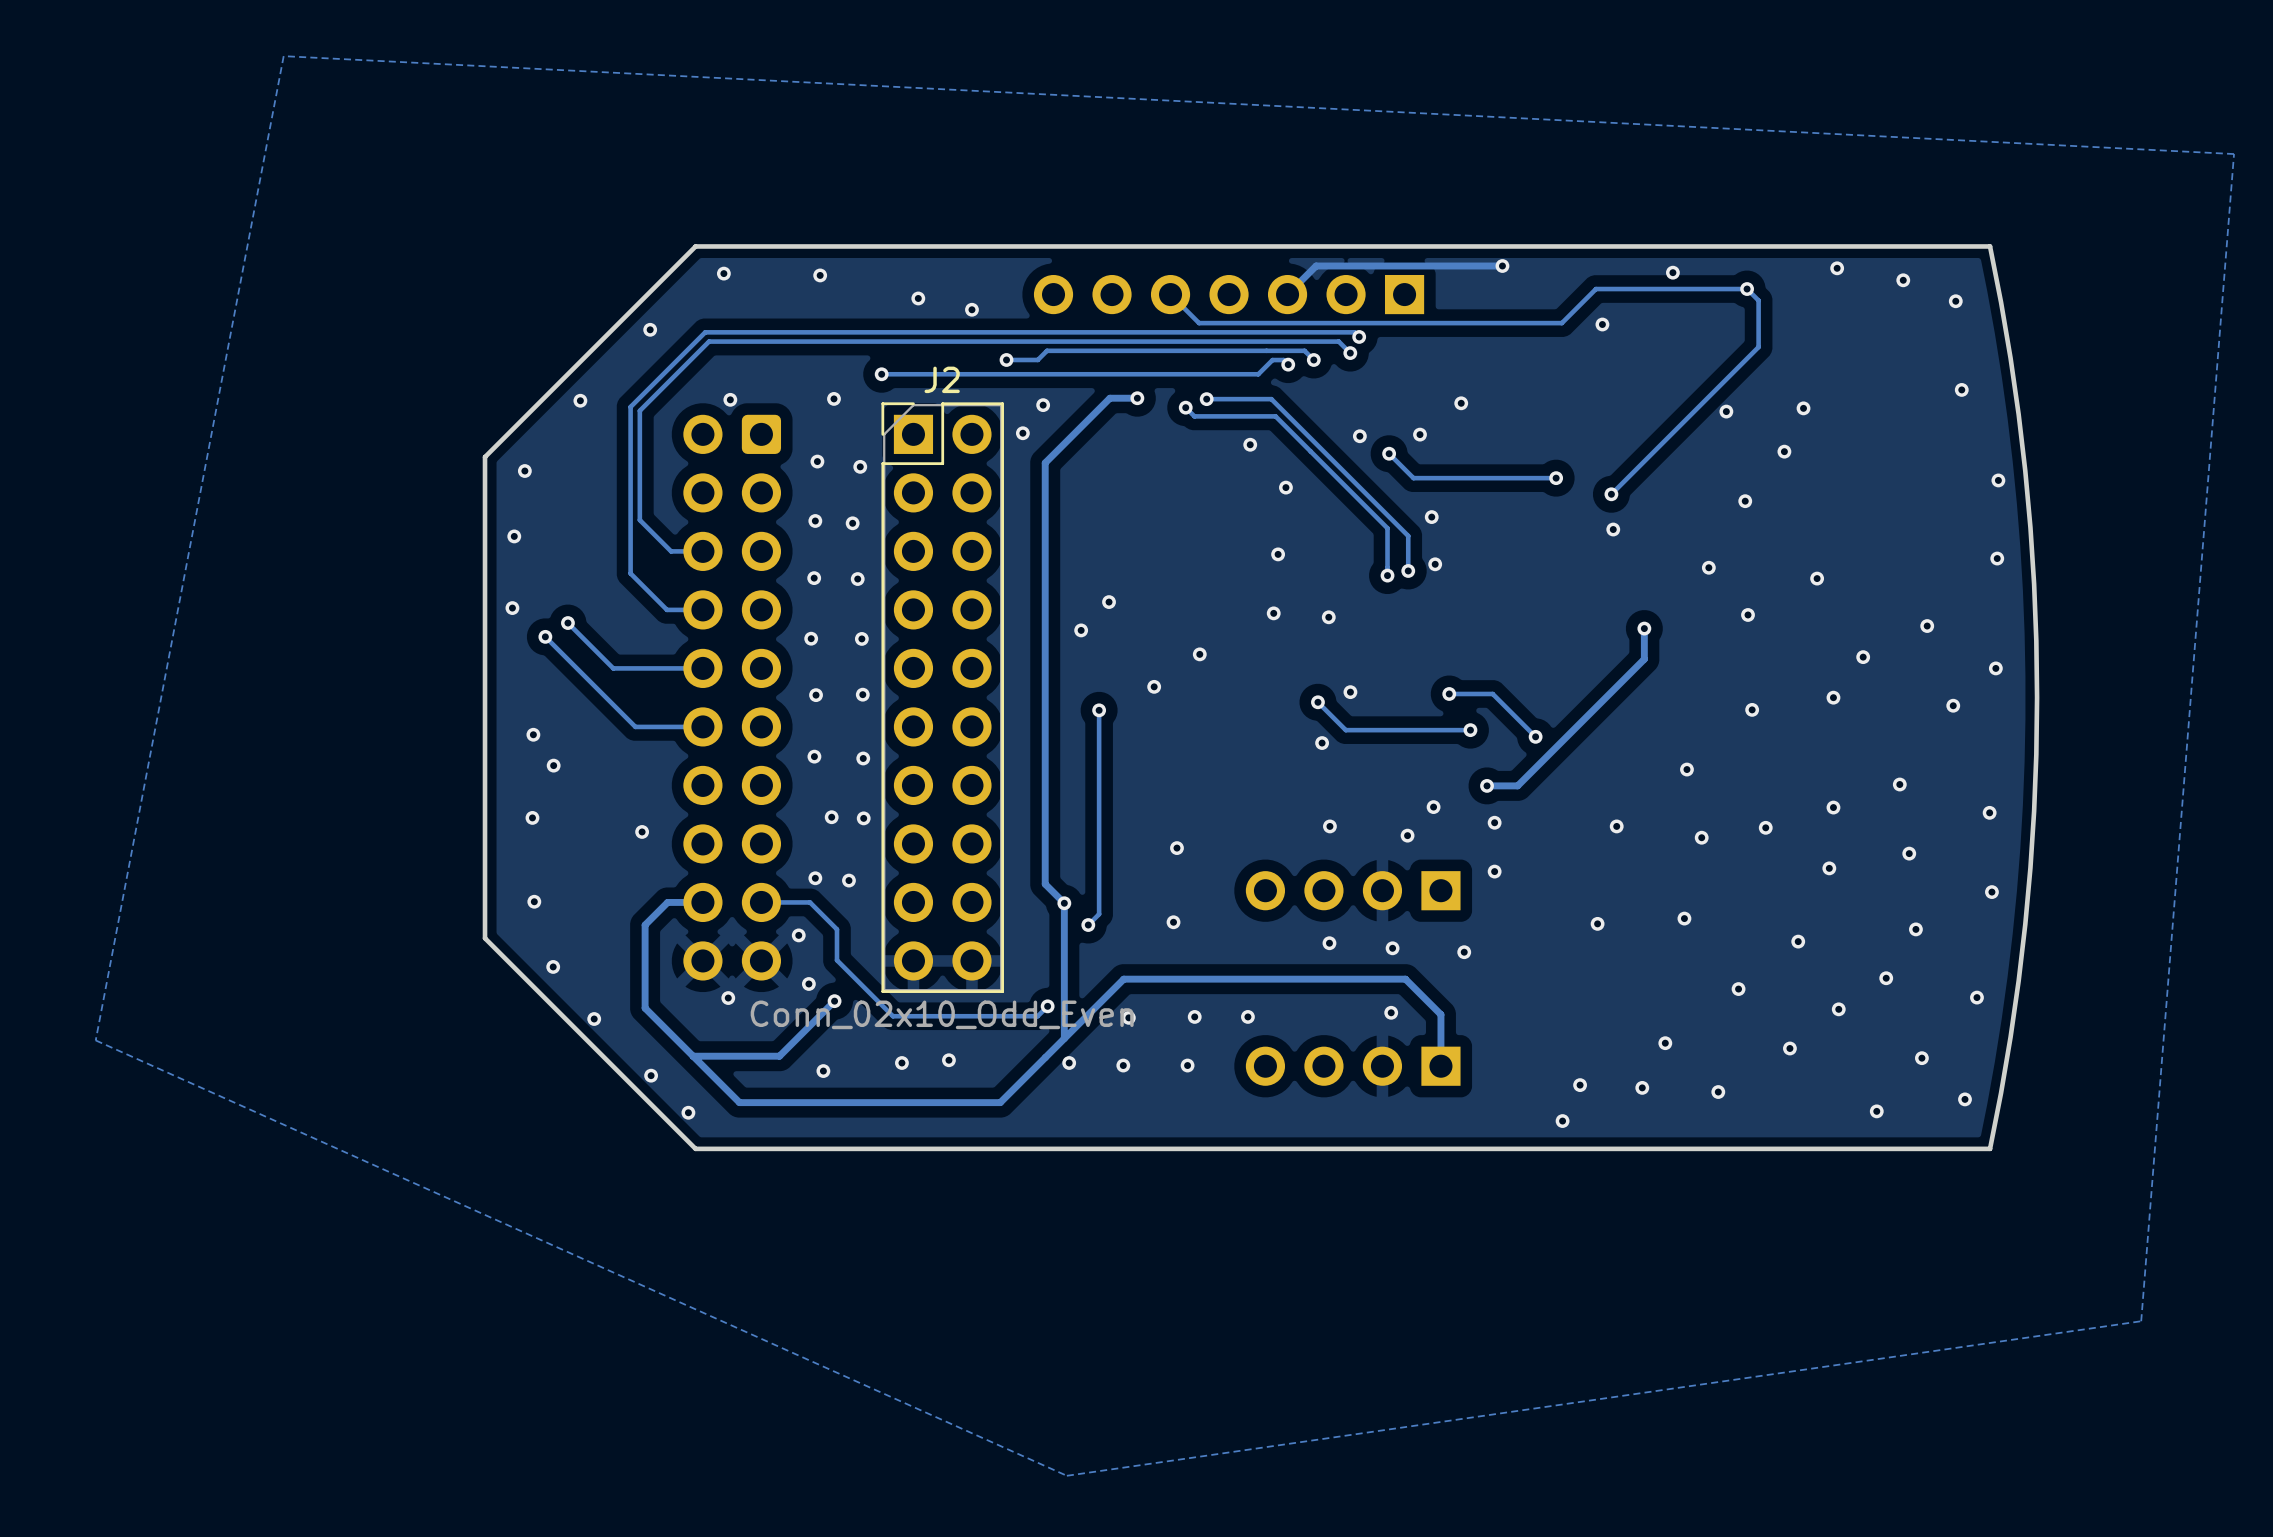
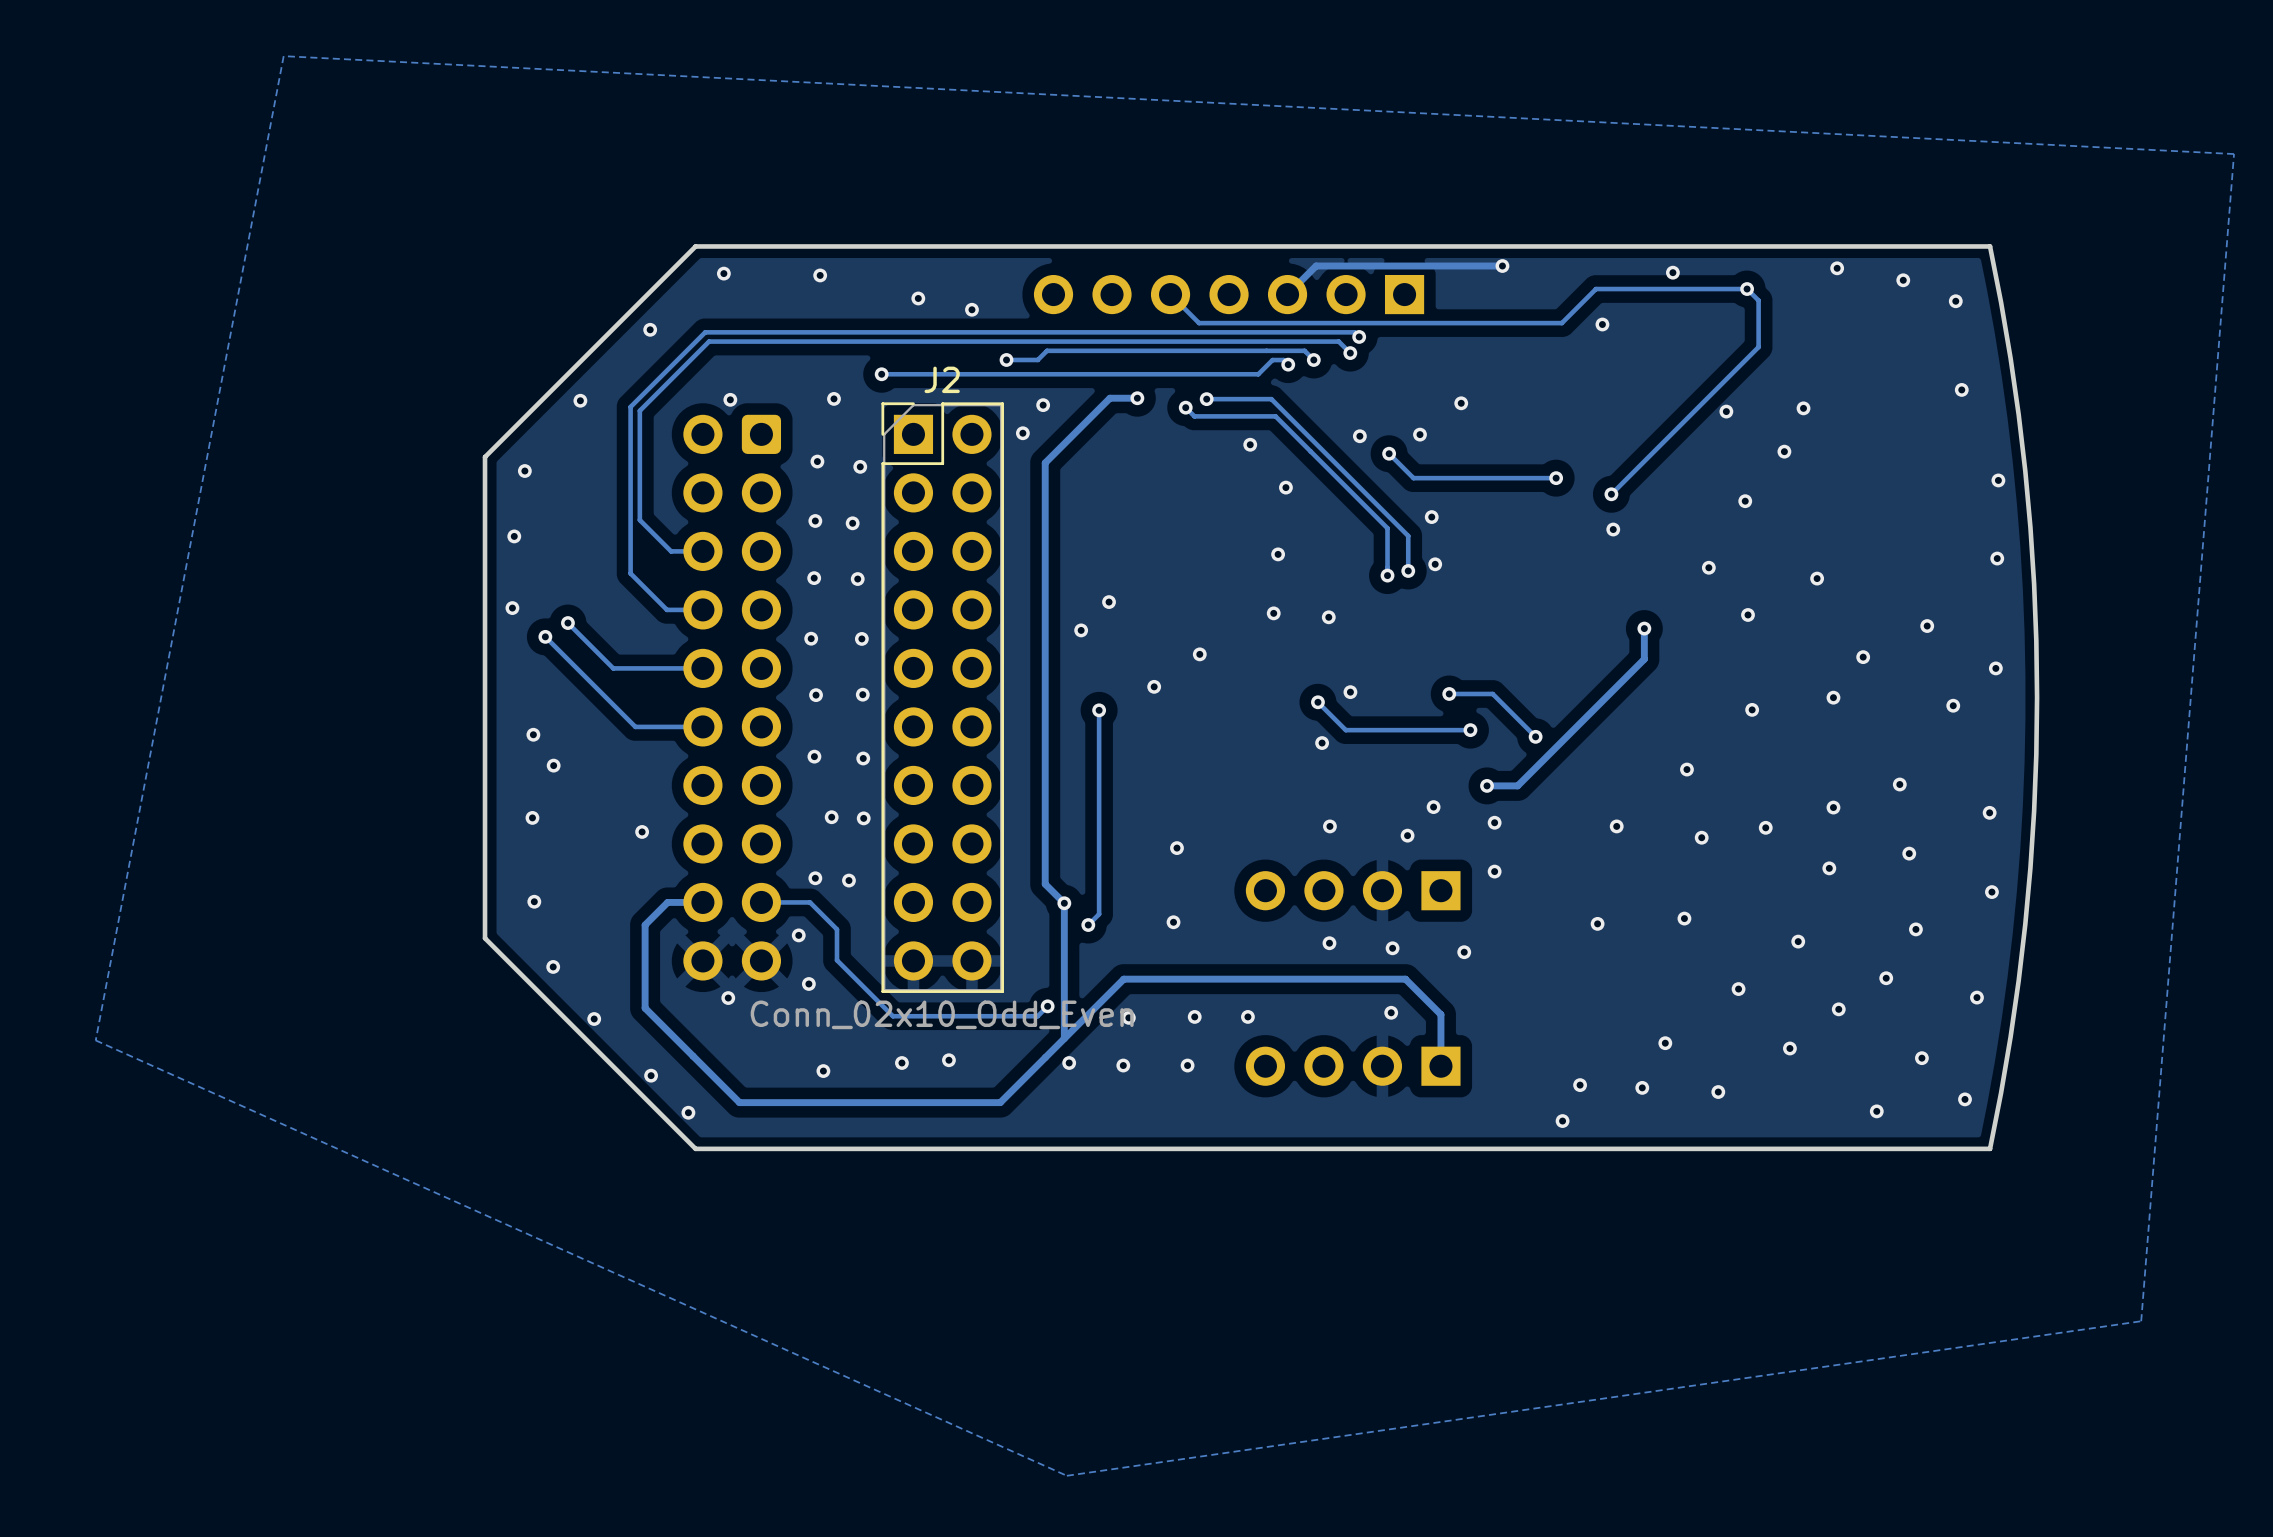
track: (834, 1001) (779, 1056) (693, 1056) -> none
via: (834, 1001) -> none

